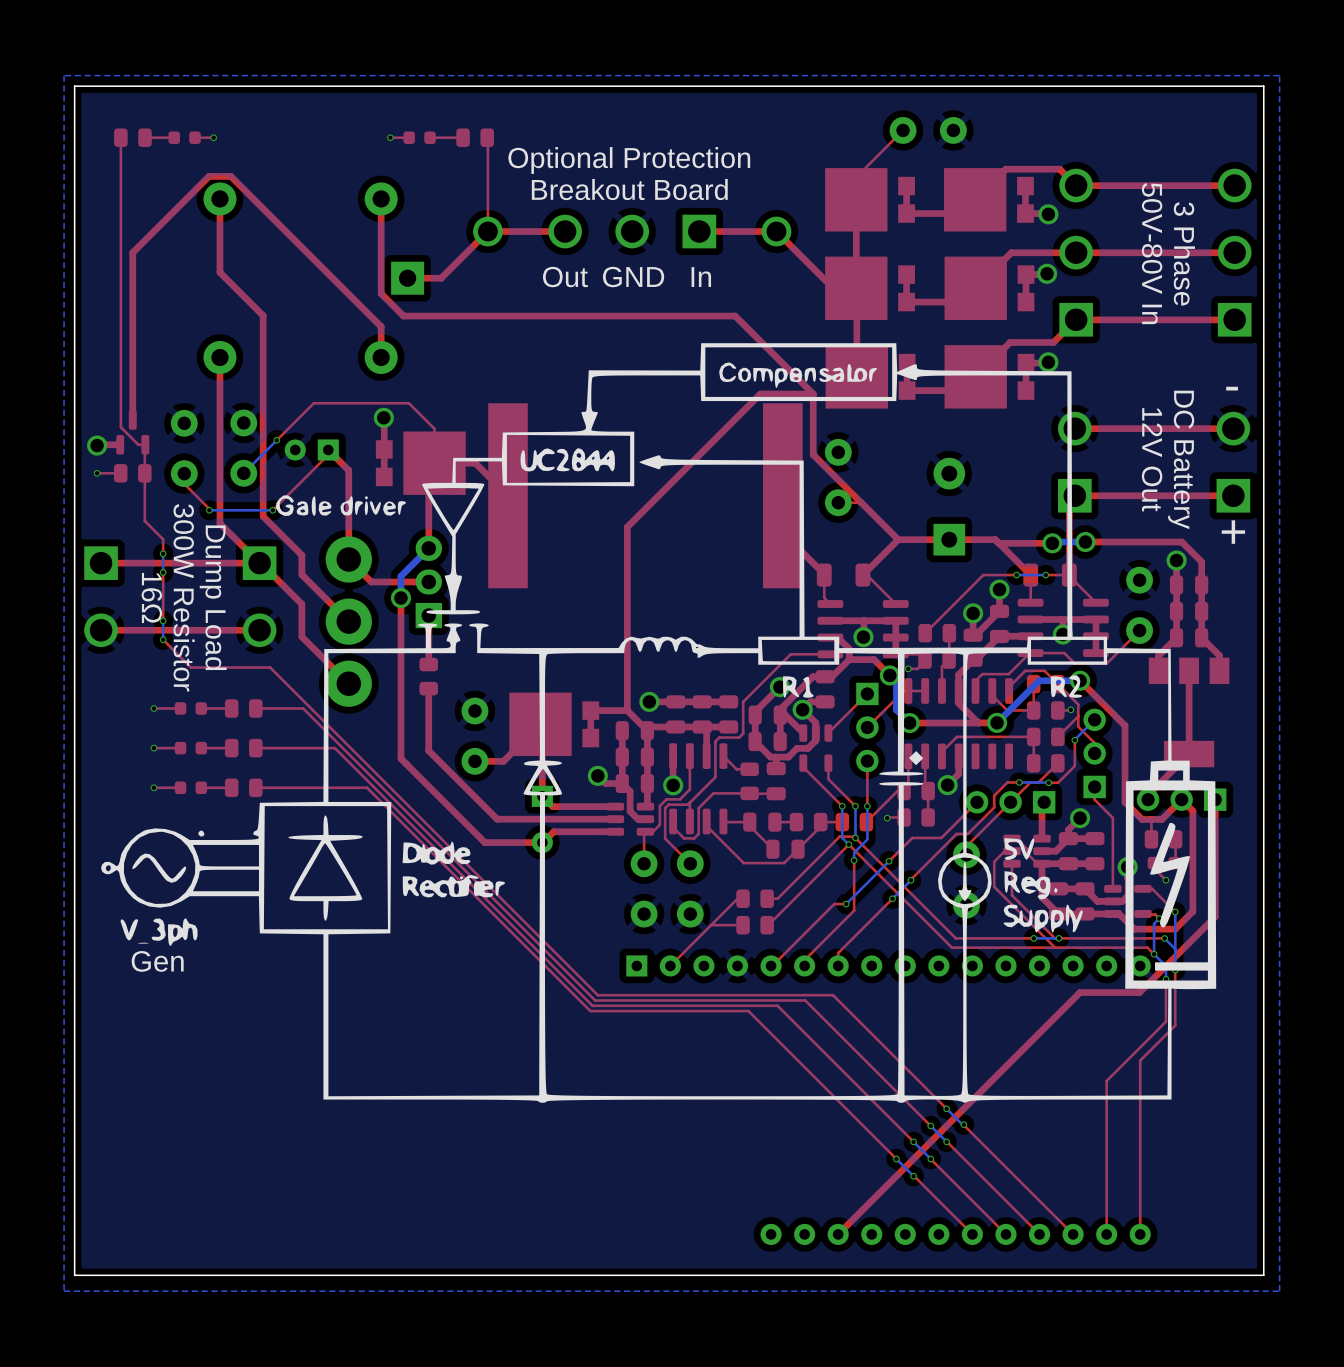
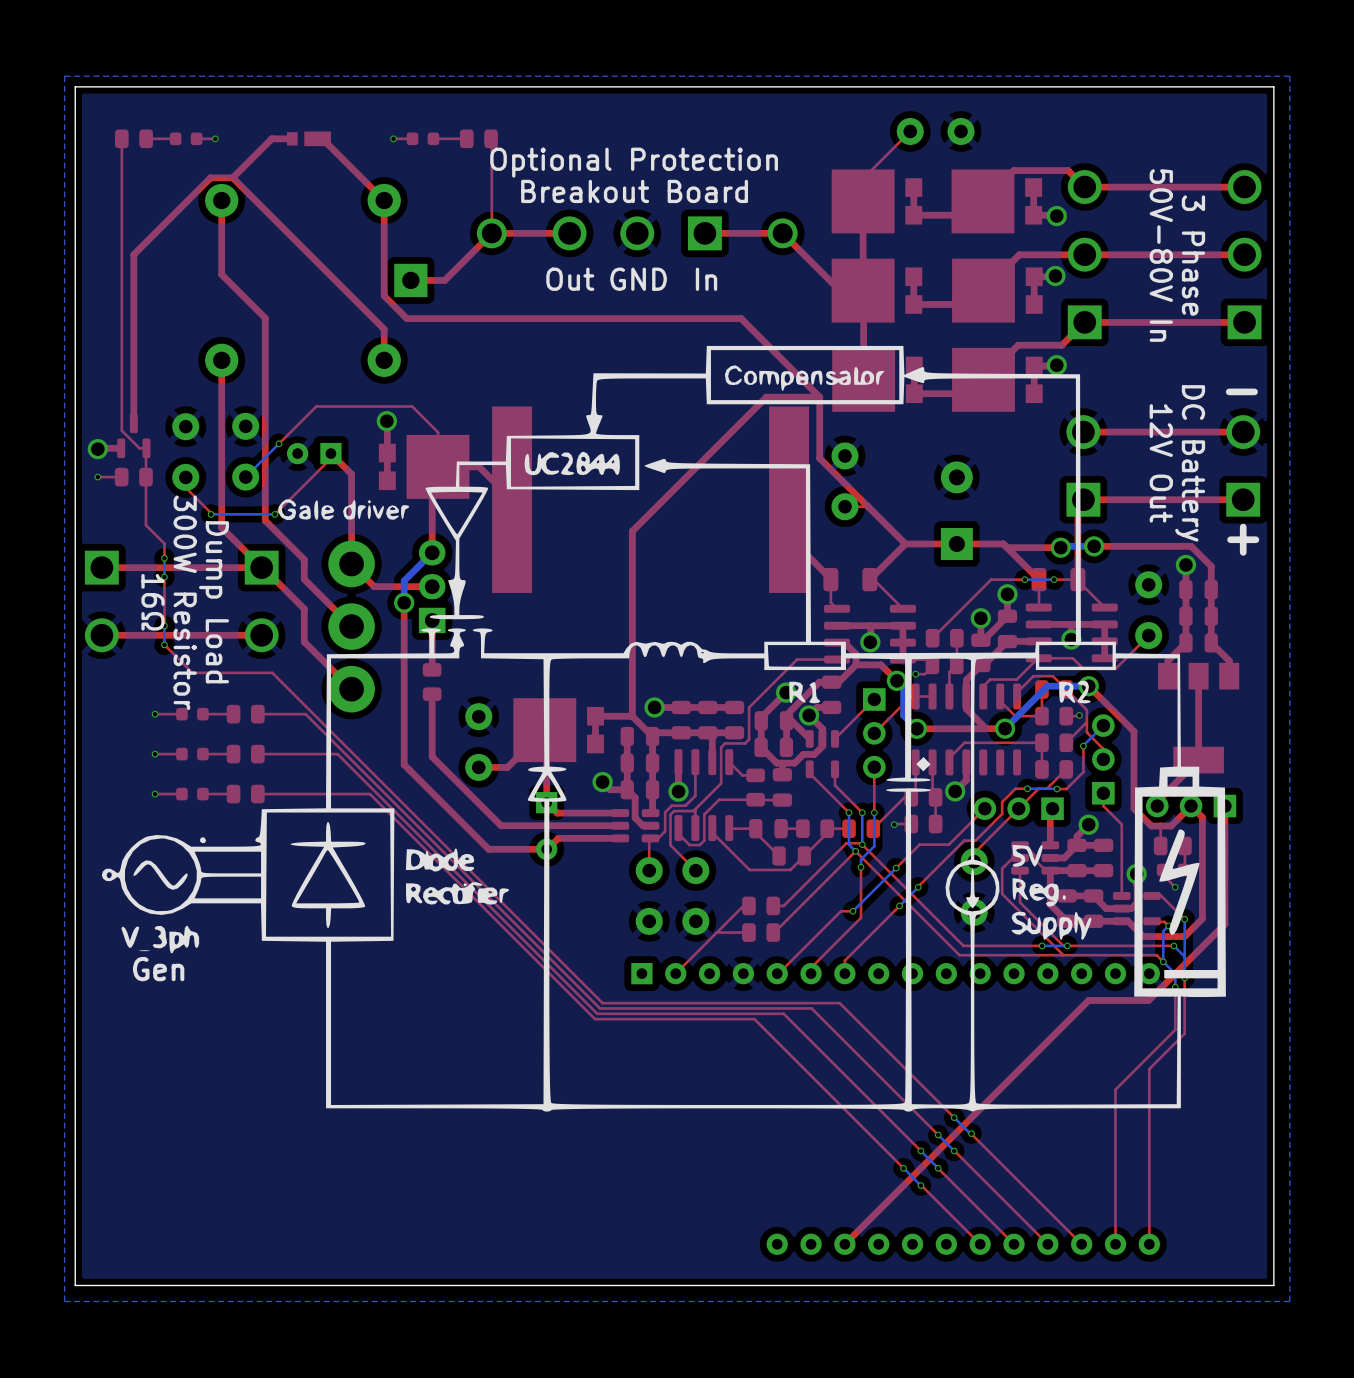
top track: none -> (292, 138) (271, 138) (232, 177)
part: none -> (308, 138)
top track: none -> (317, 138) (322, 138) (384, 200)

